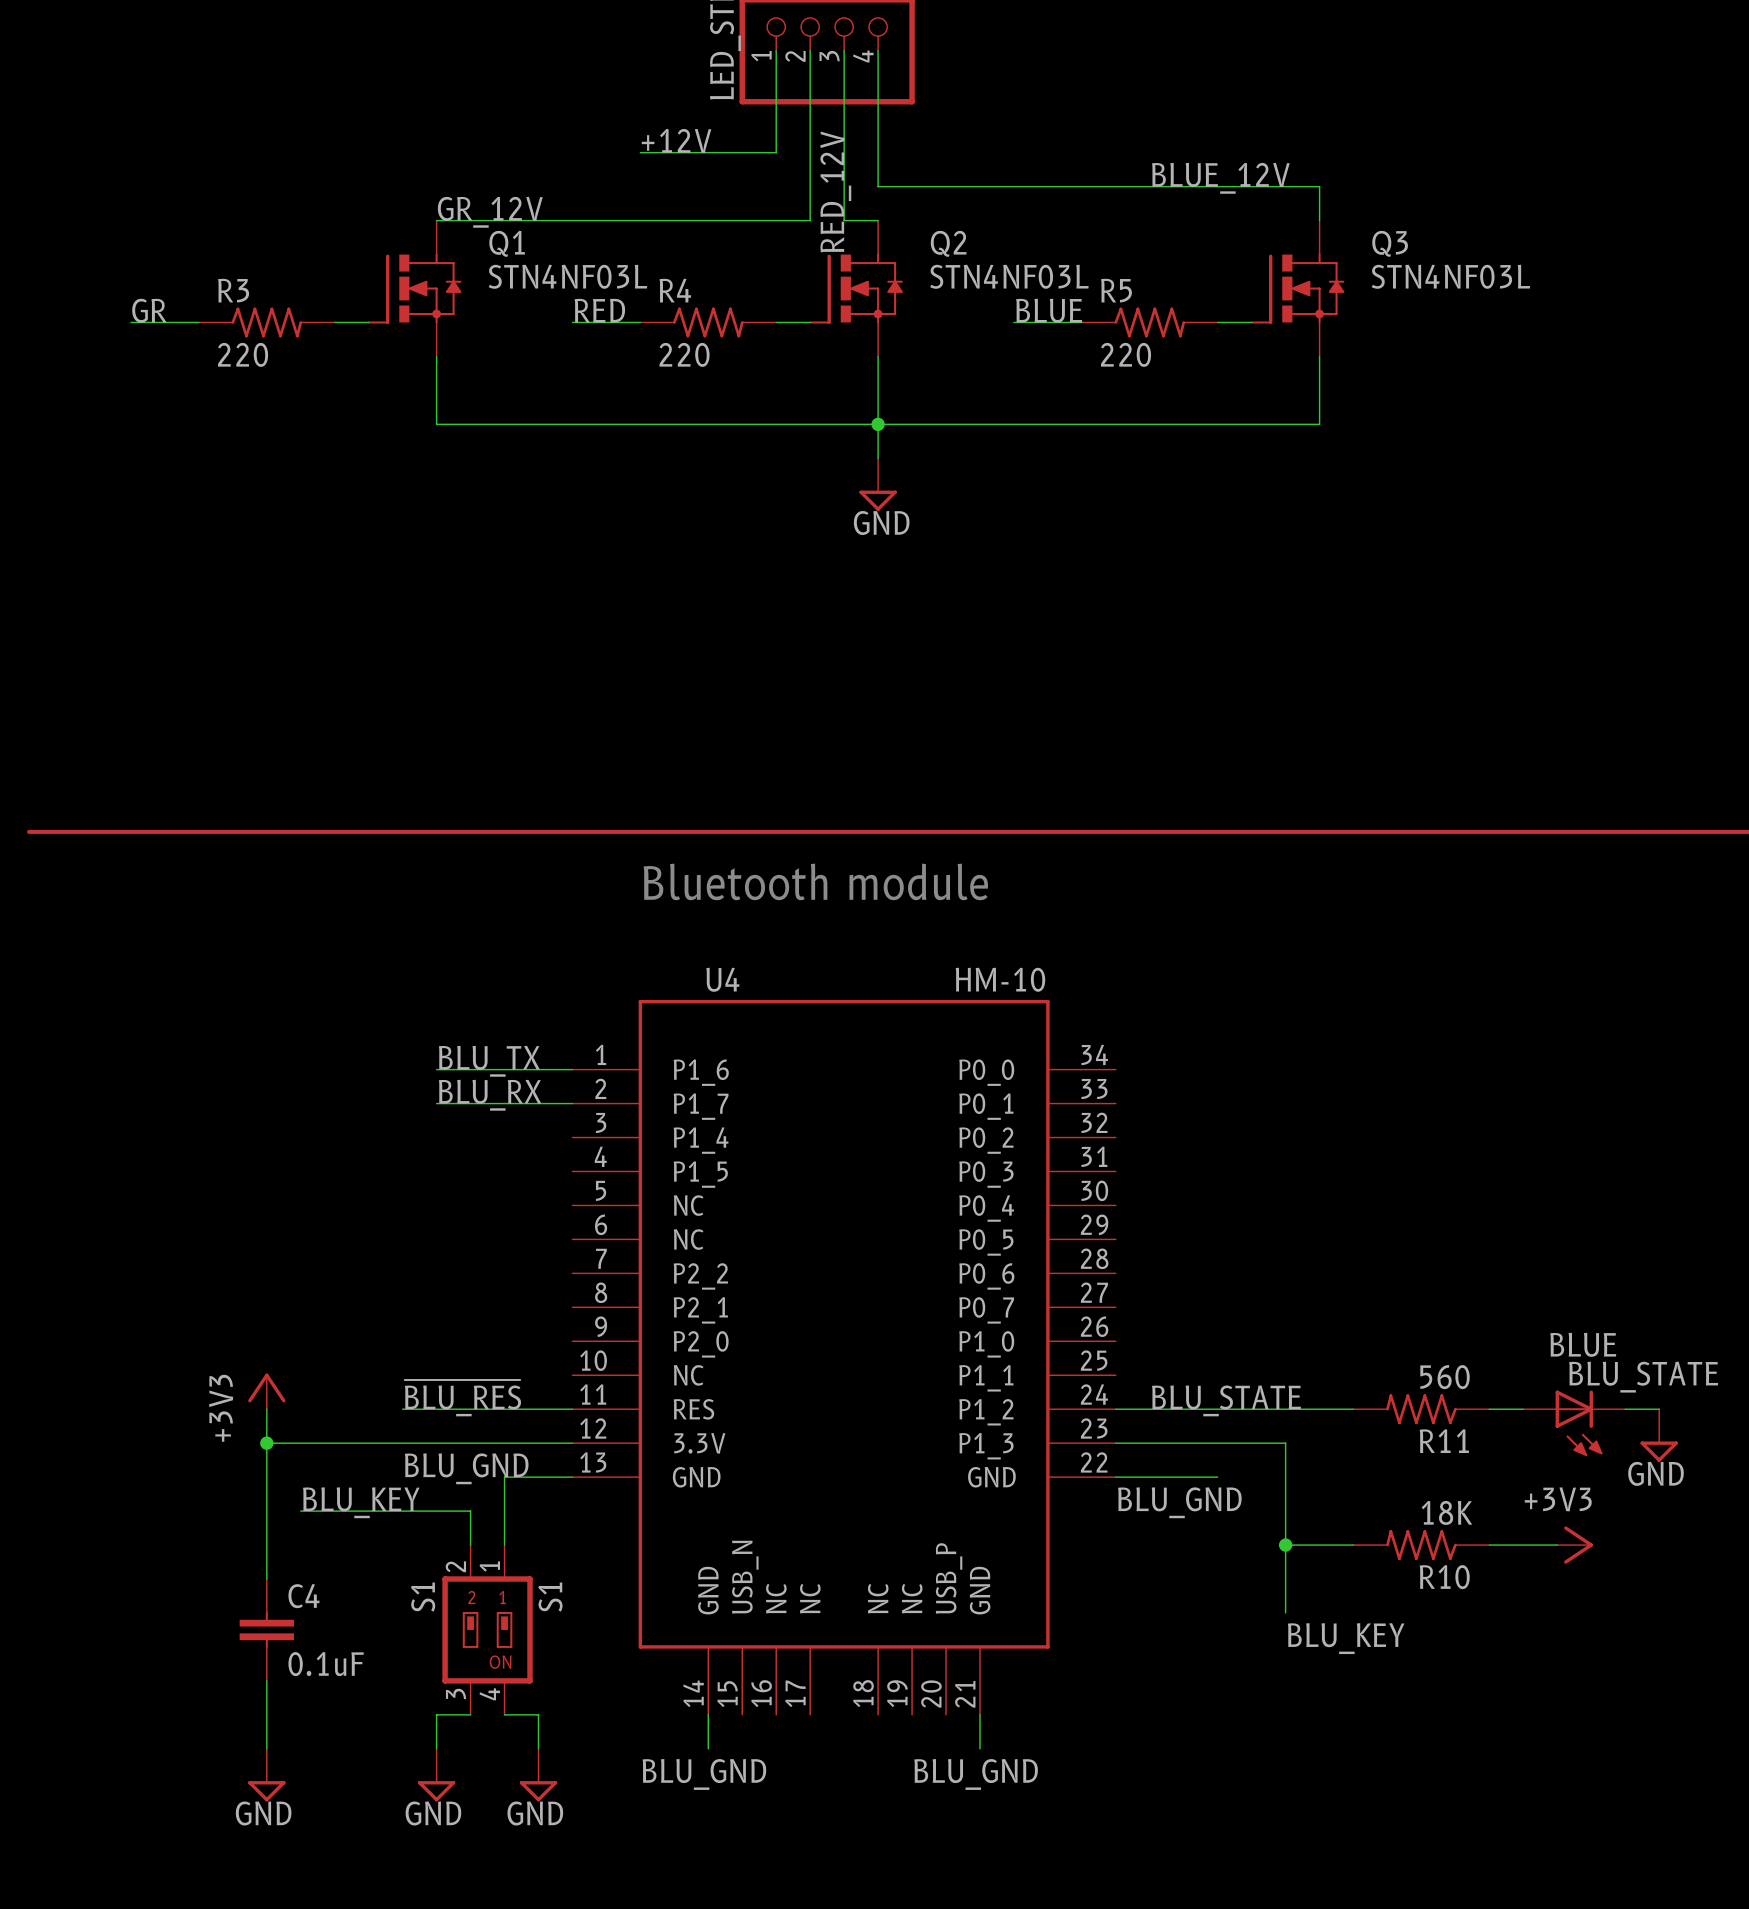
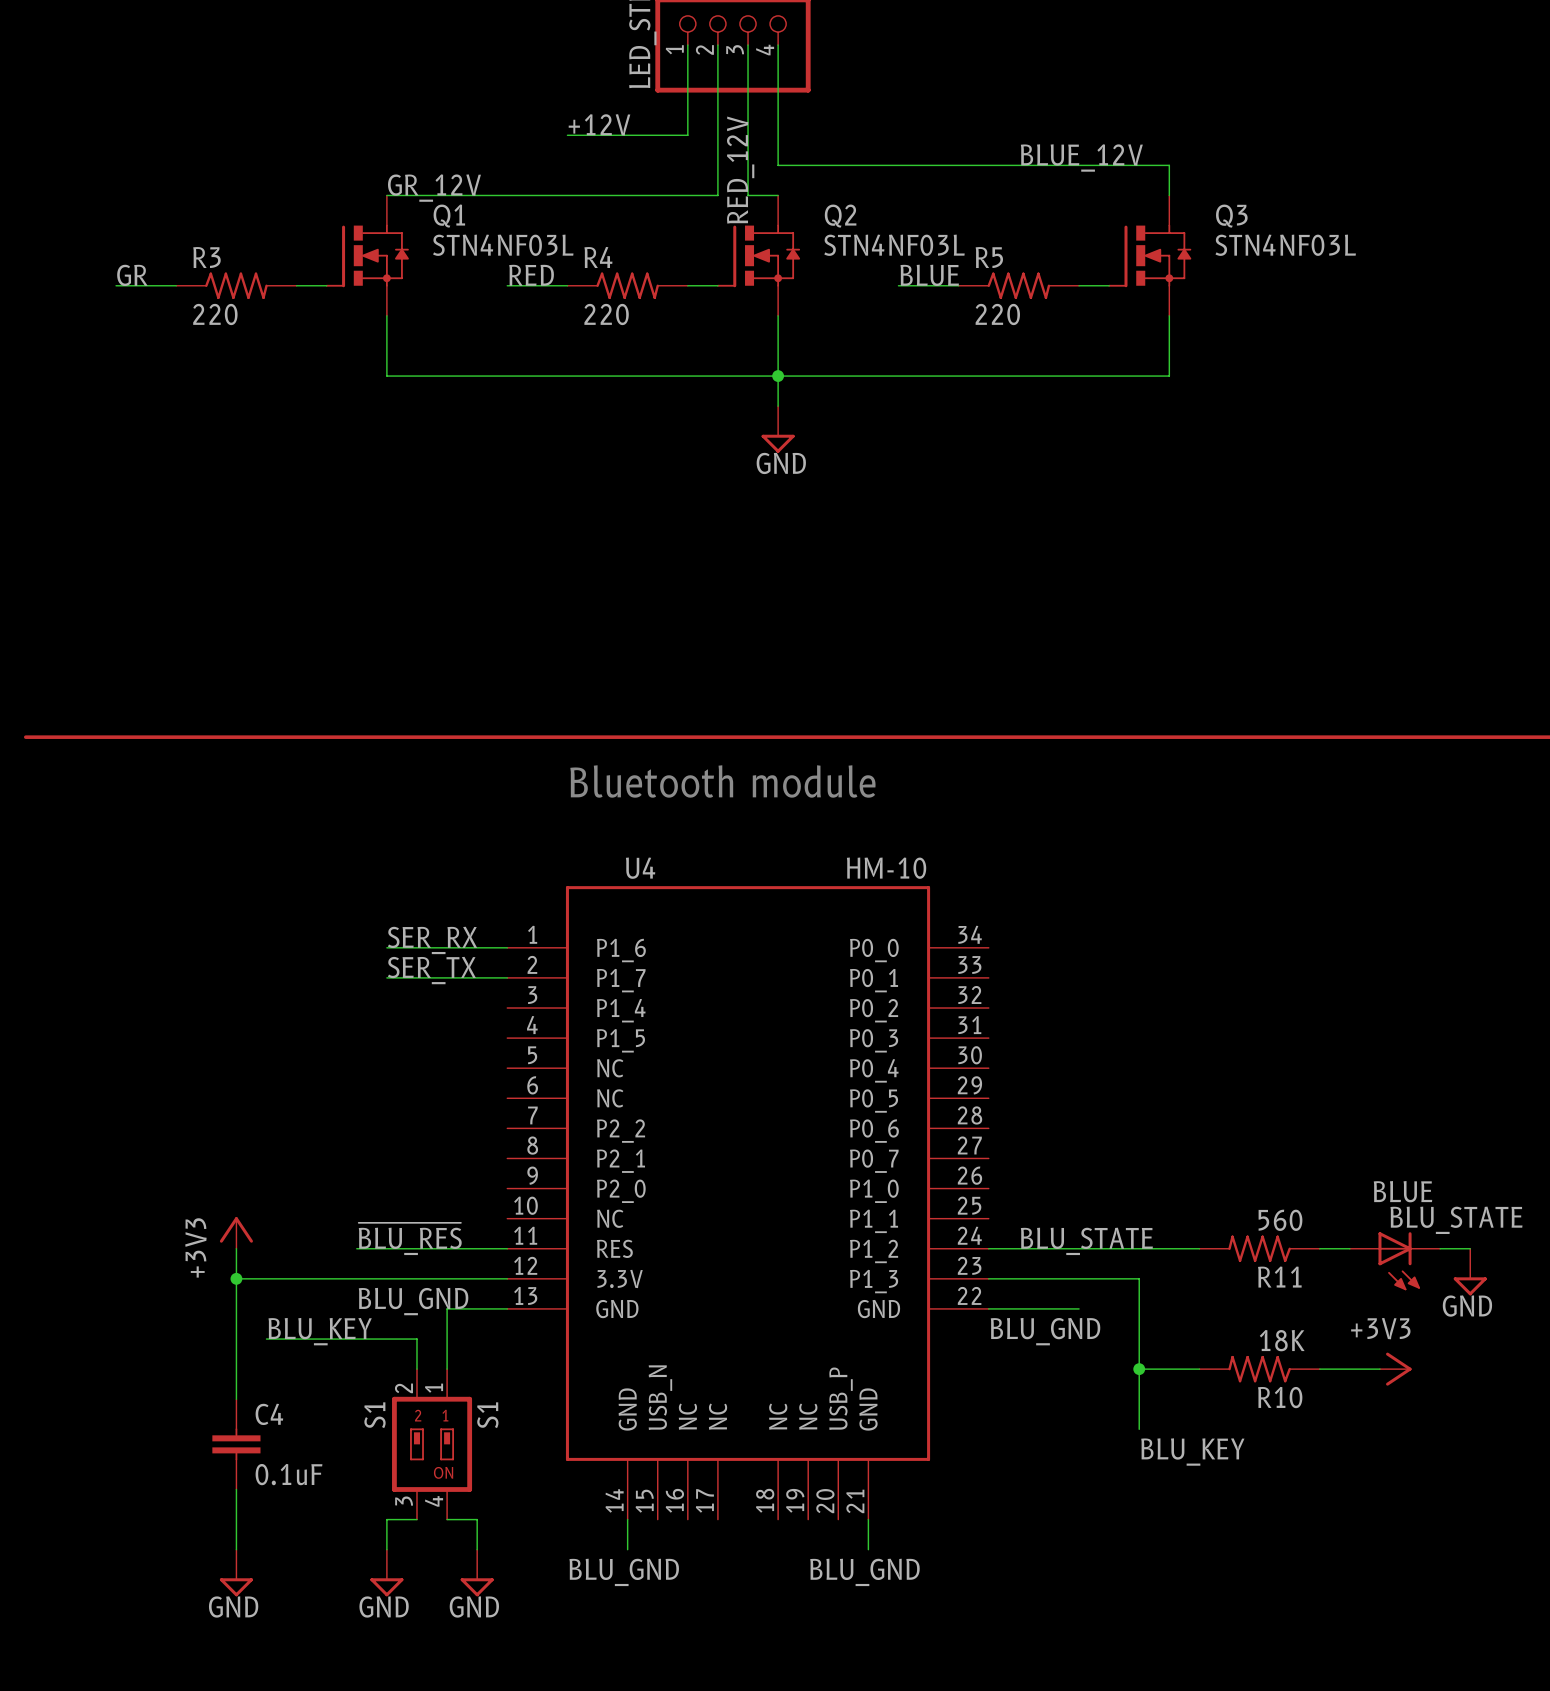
label: BLU_TX (489, 1061) -> SER_RX (432, 940)
label: BLU_RX (490, 1095) -> SER_TX (431, 970)

